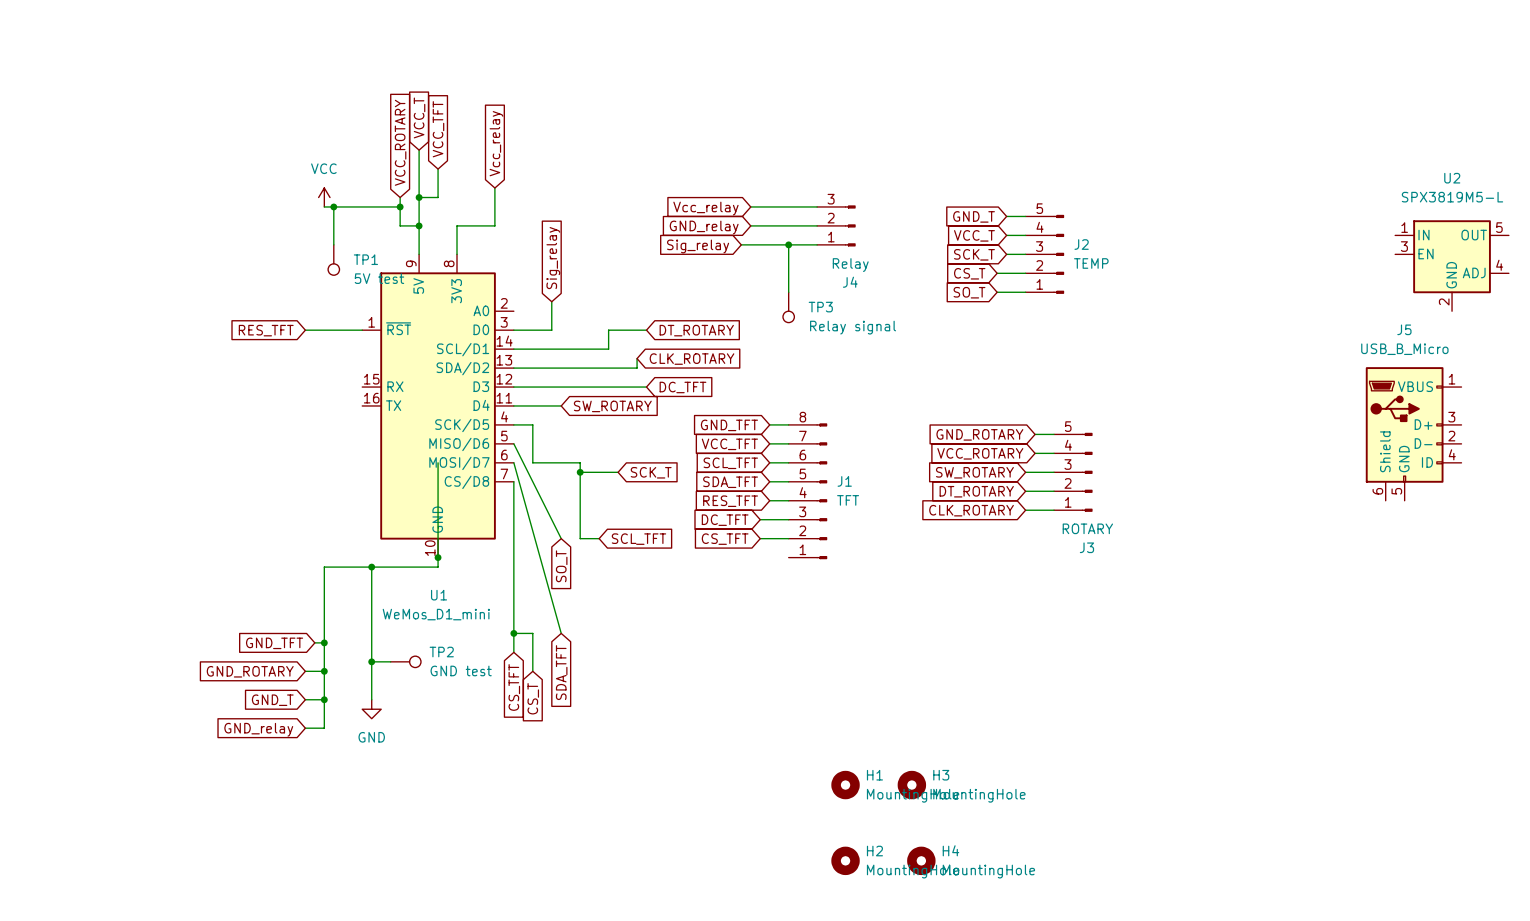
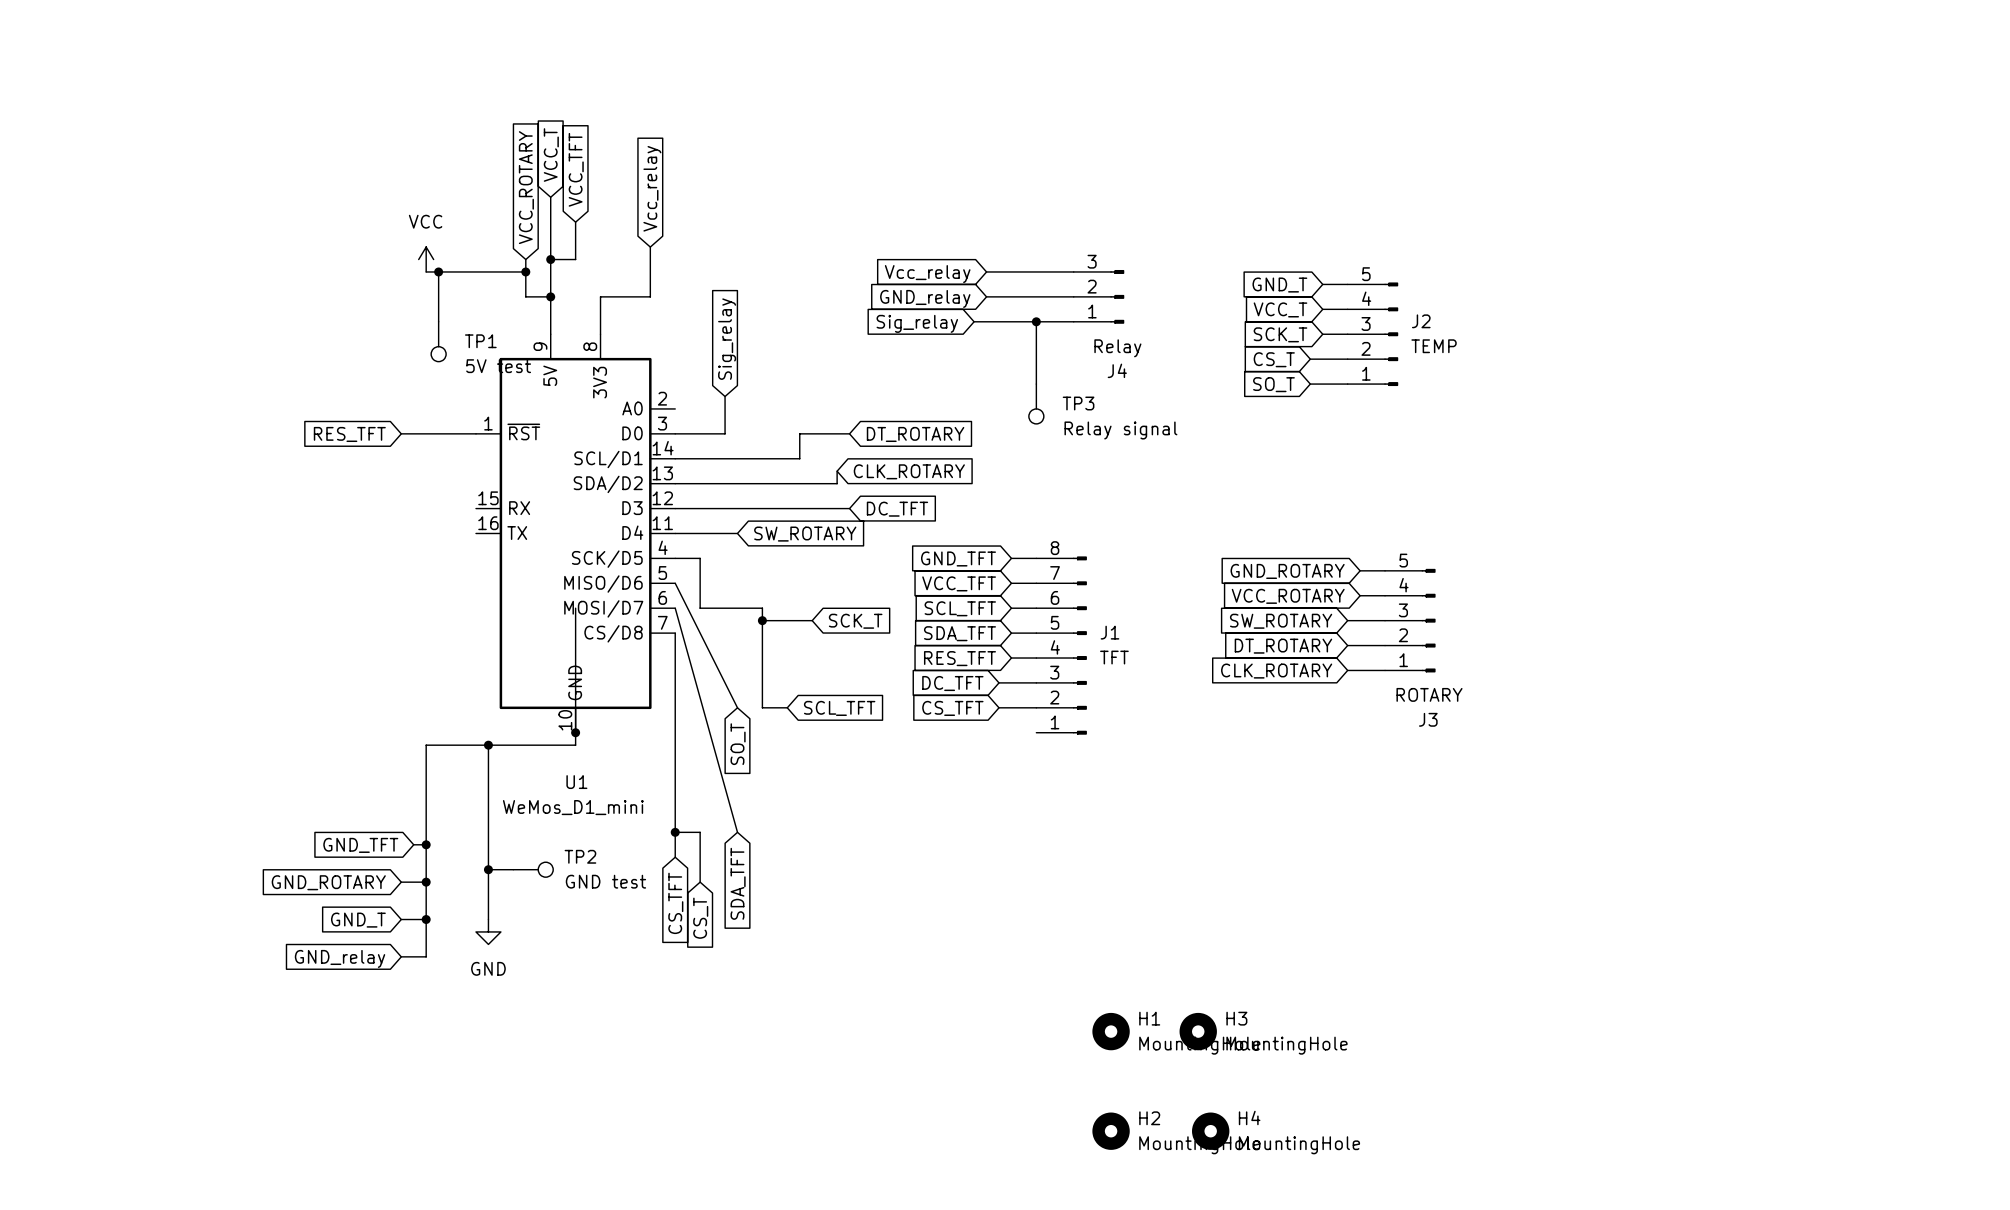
U2: SPX3819M5-L (1452, 265) -> none
J5: USB_B_Micro (1413, 433) -> none

